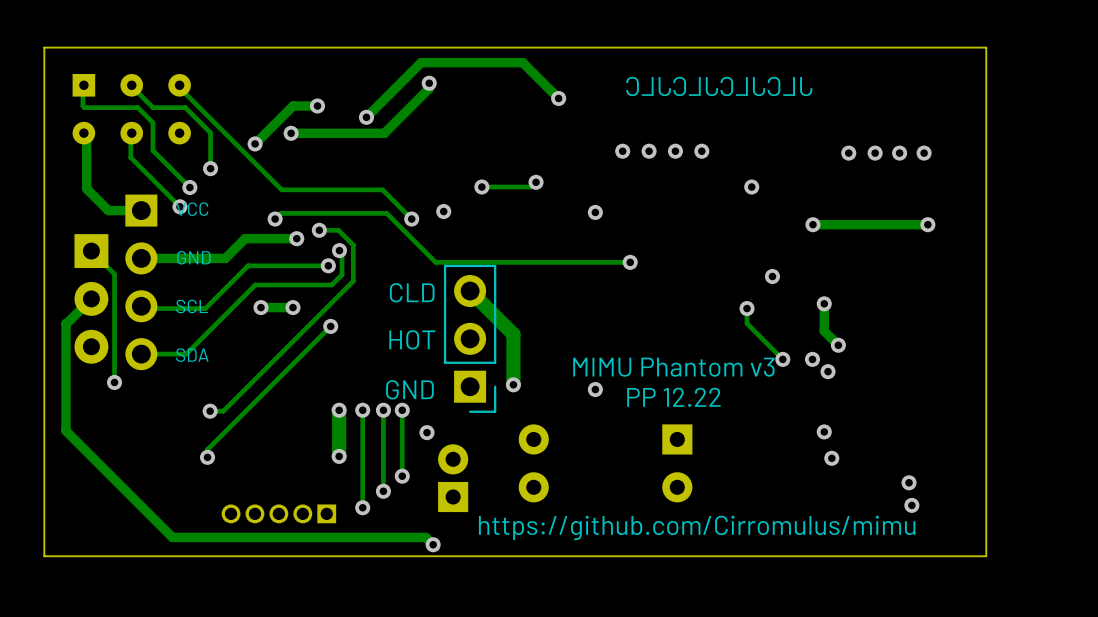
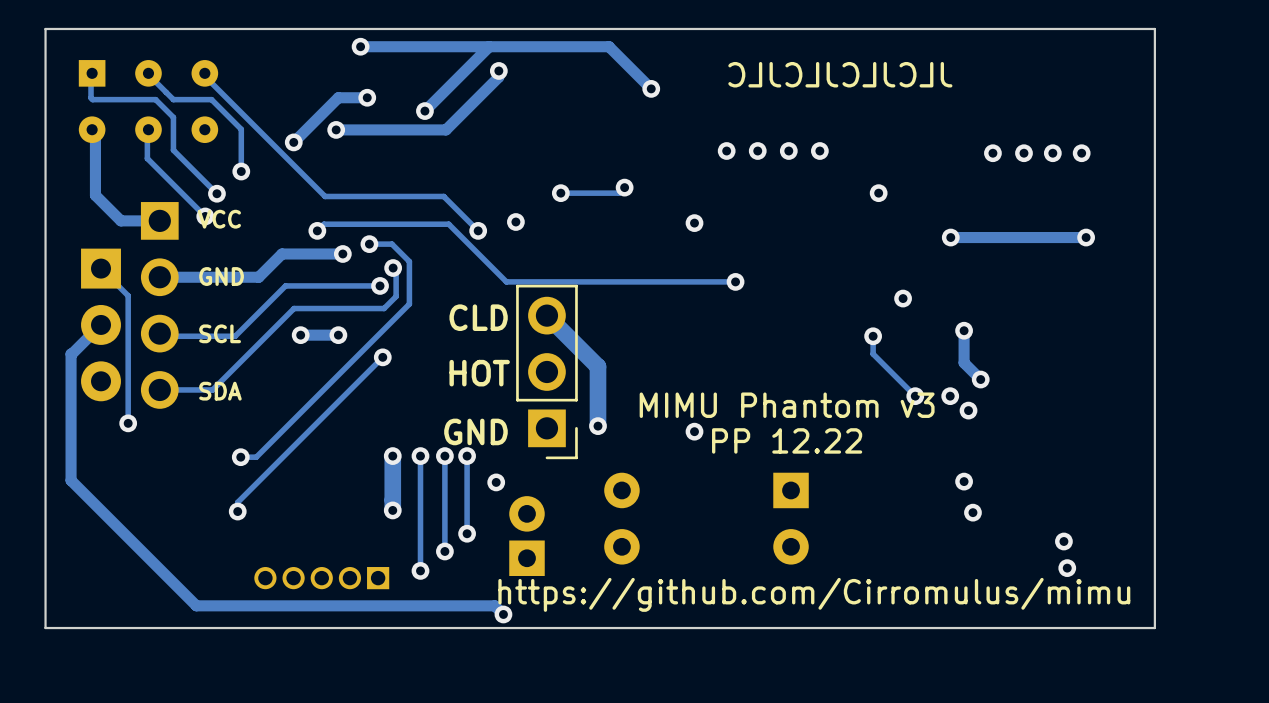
via: none -> (360, 46)
track: none -> (489, 46) (360, 46)

